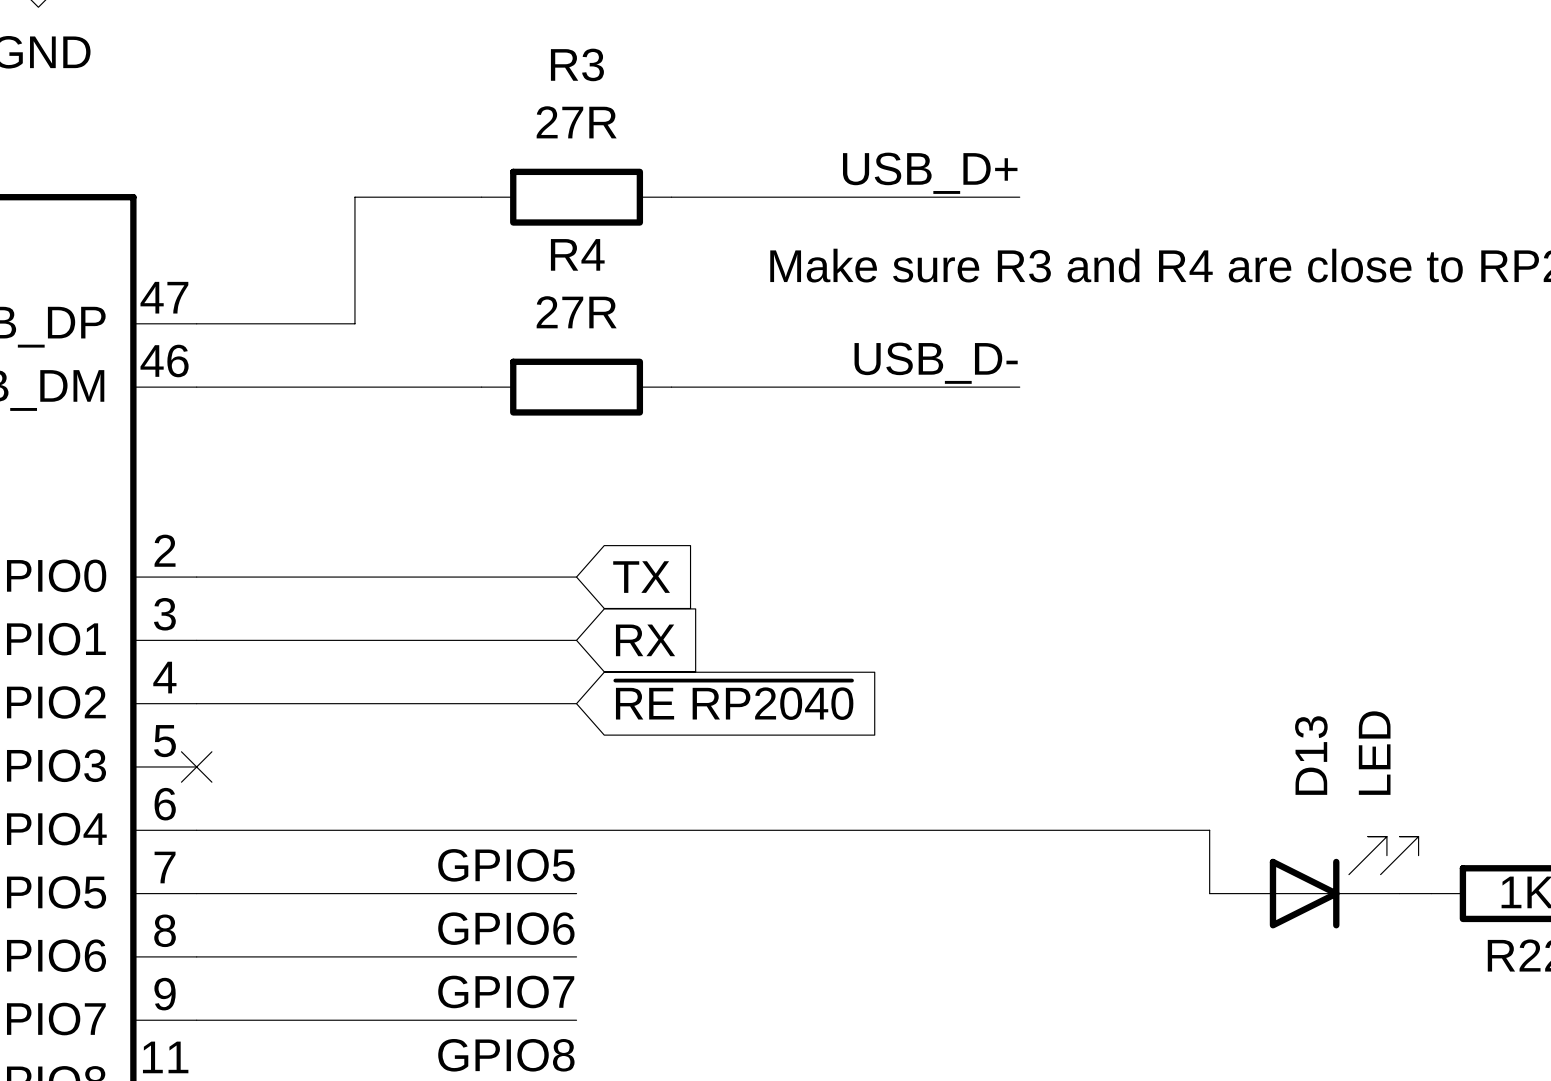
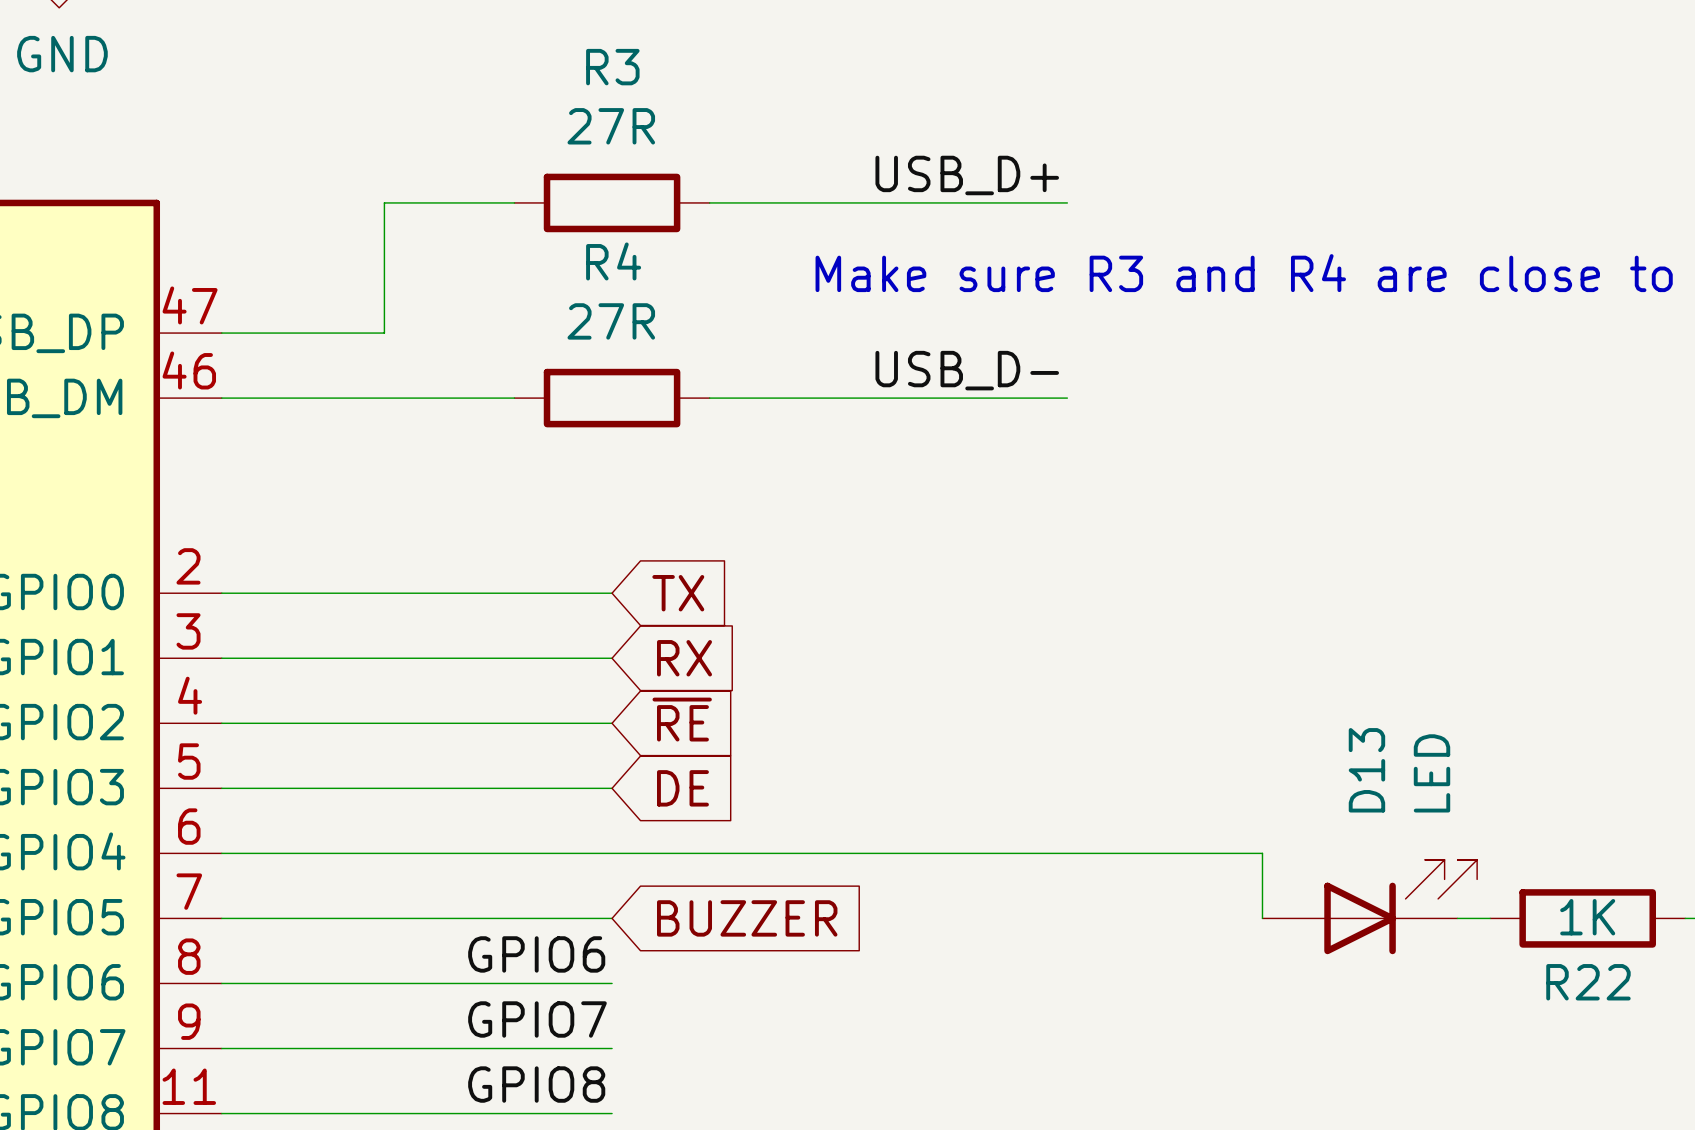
global label: ~{RE RP2040} (734, 700) -> ~{RE} (682, 719)
wire: none -> (221, 788) (612, 788)
no-connect mark: (196, 766) -> none
global label: none -> DE (682, 788)
label: GPIO5 (506, 865) -> none
global label: none -> BUZZER (747, 918)

